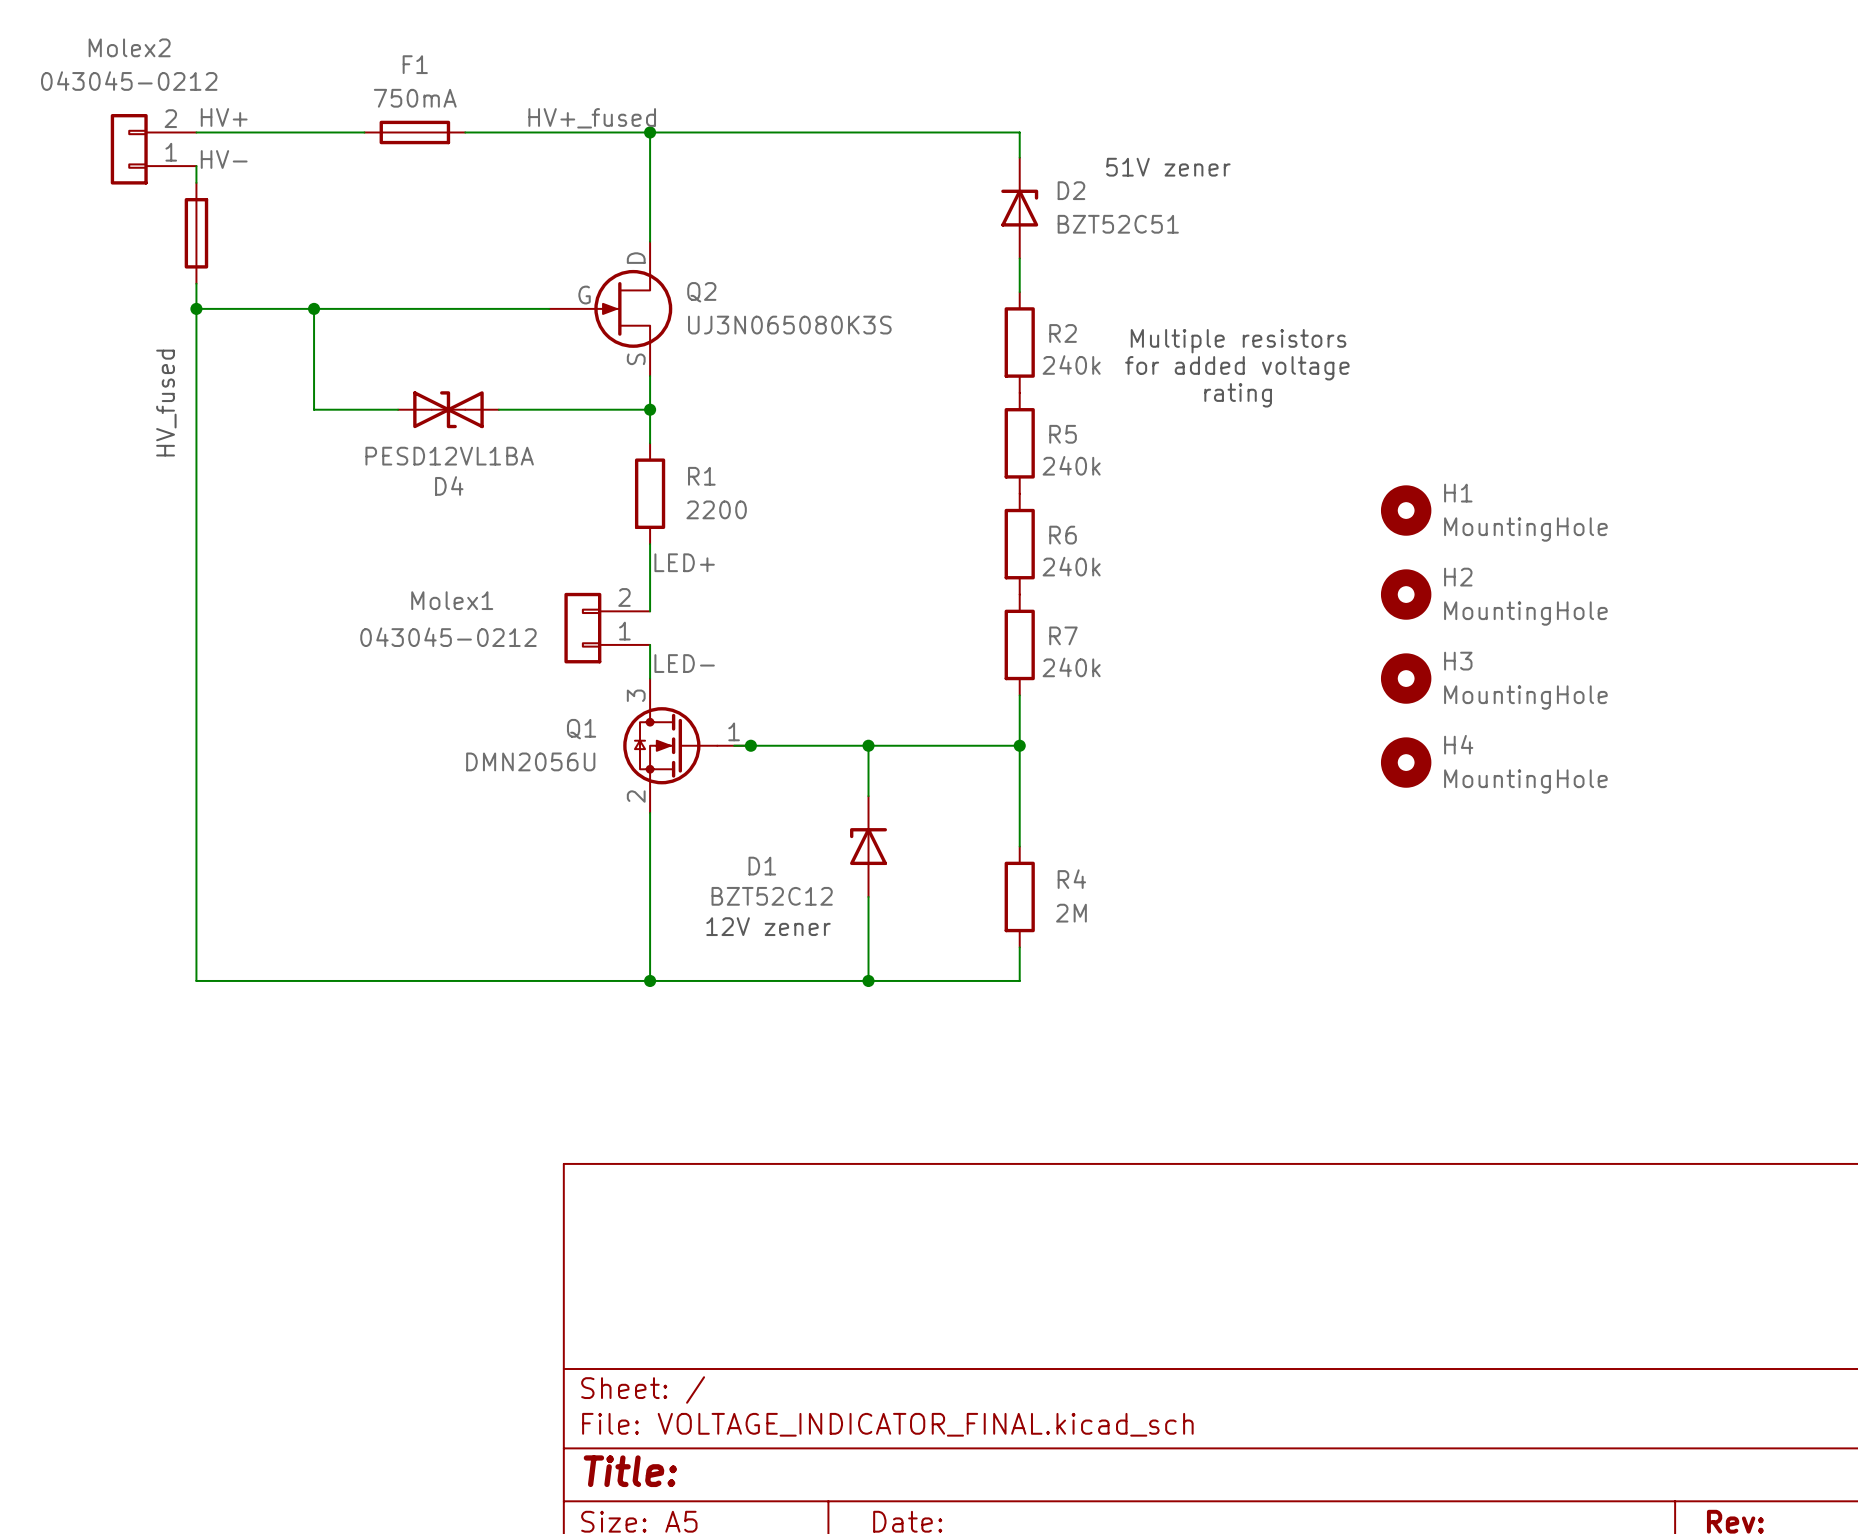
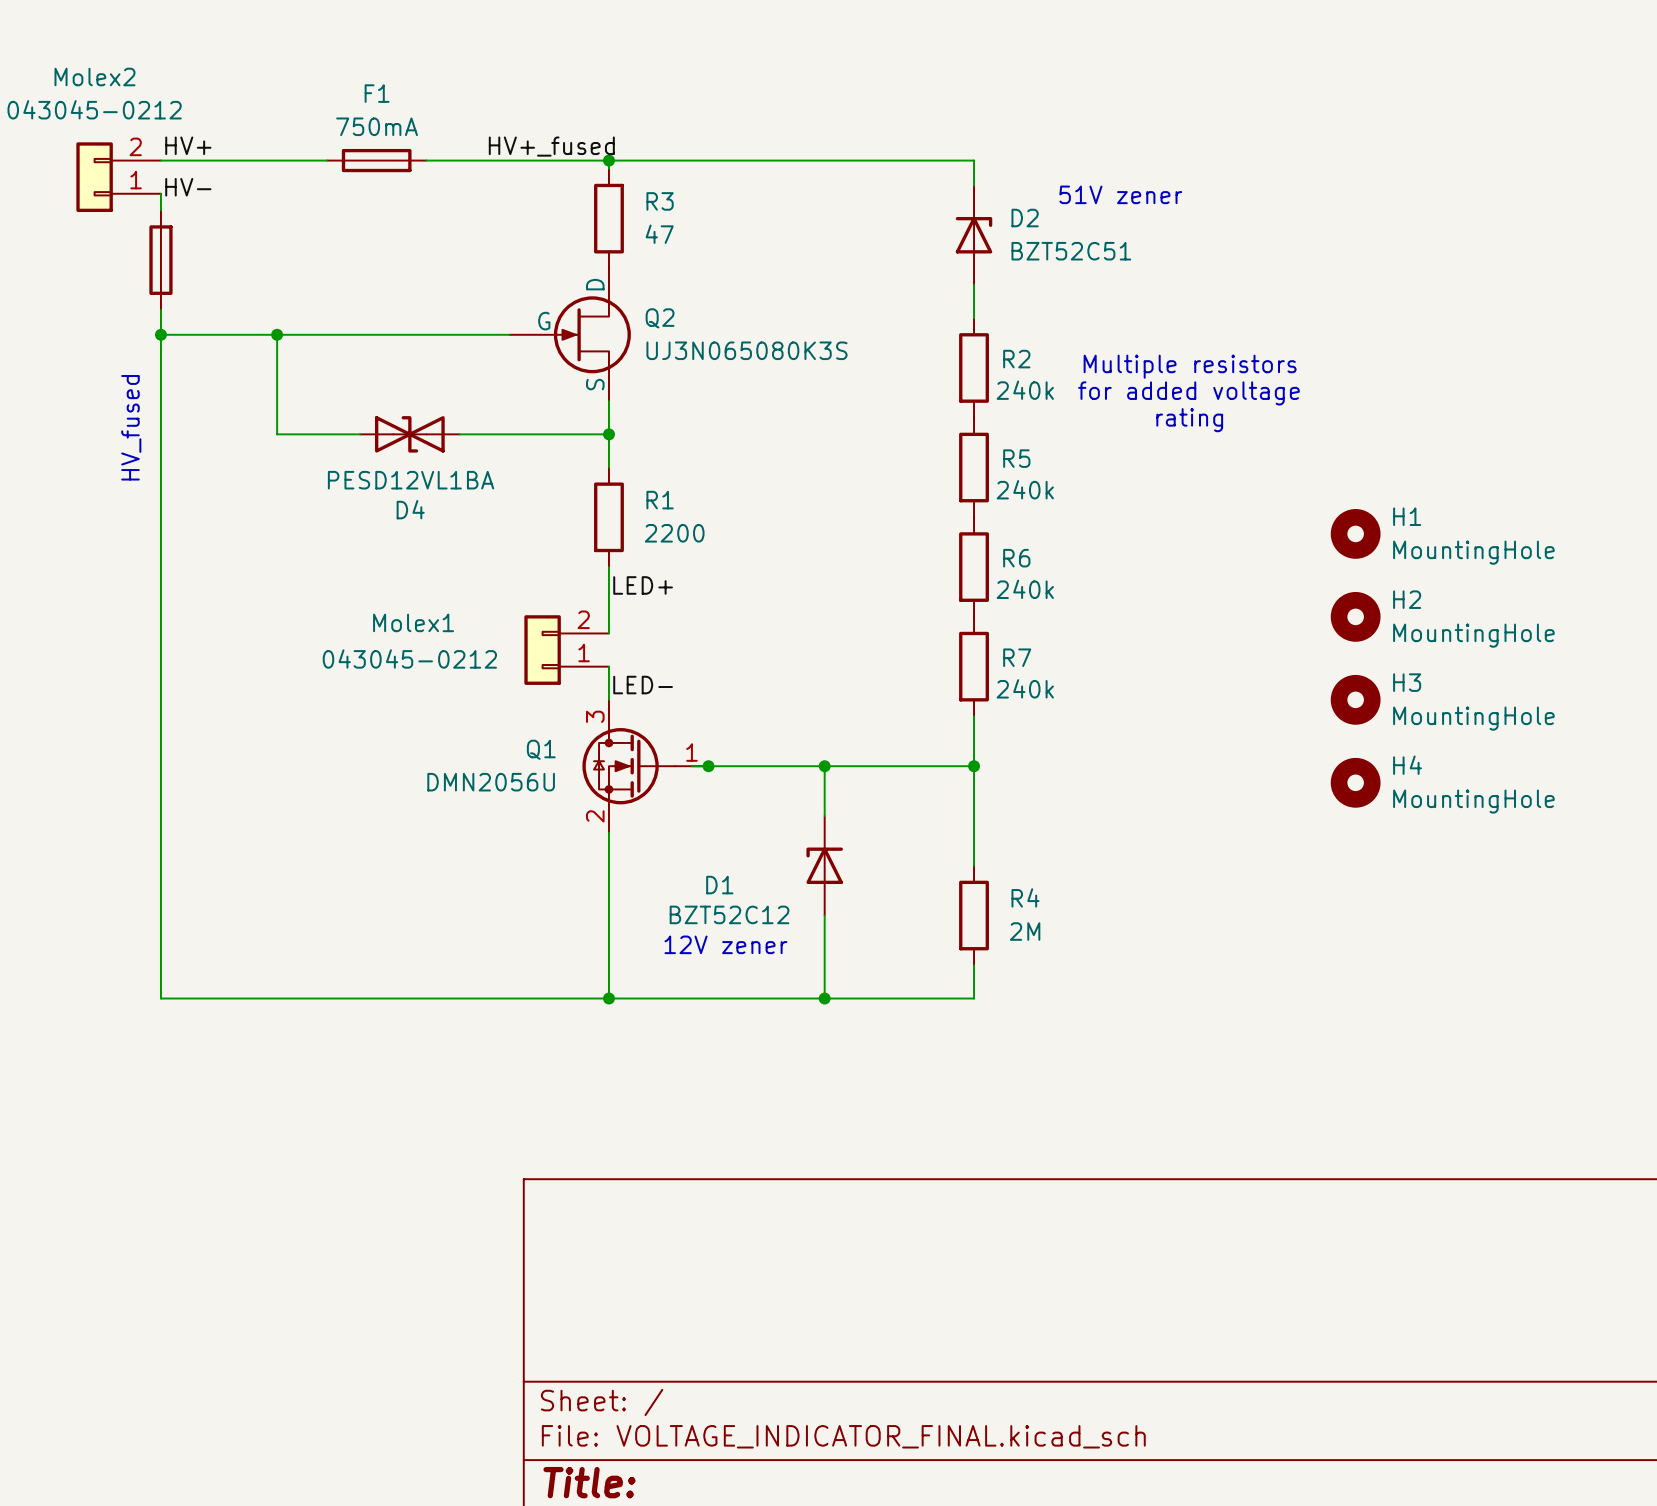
wire: (650, 140) (650, 241) -> none
R3: none -> 47 (608, 218)

